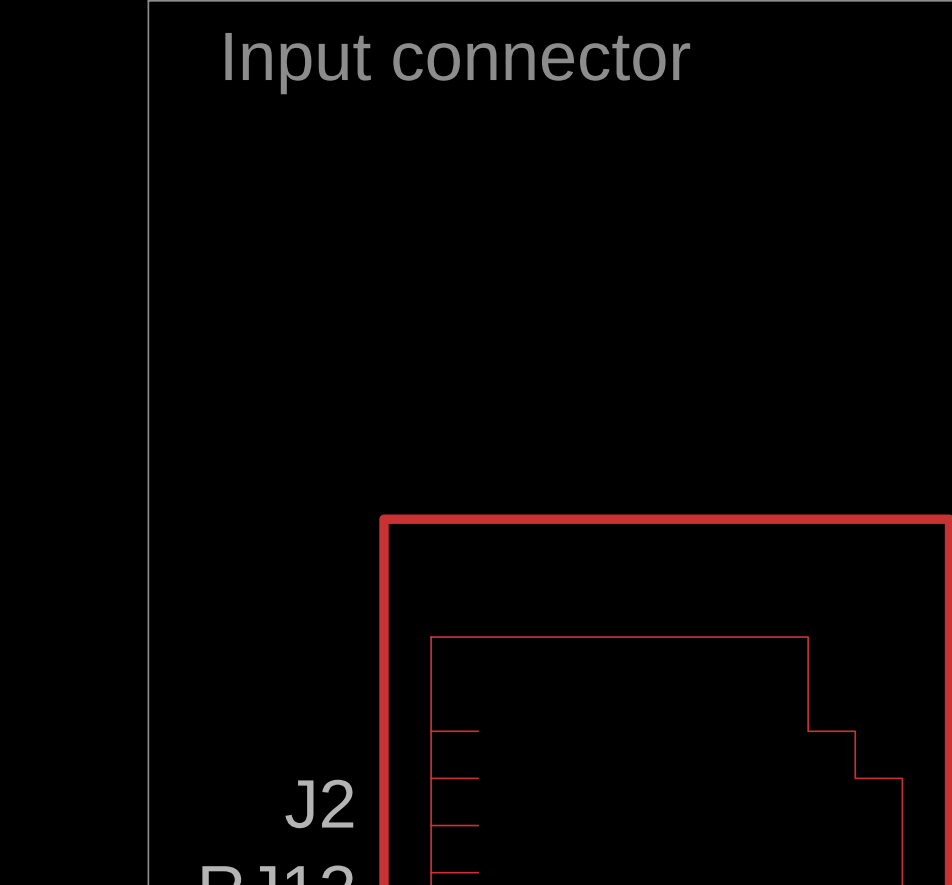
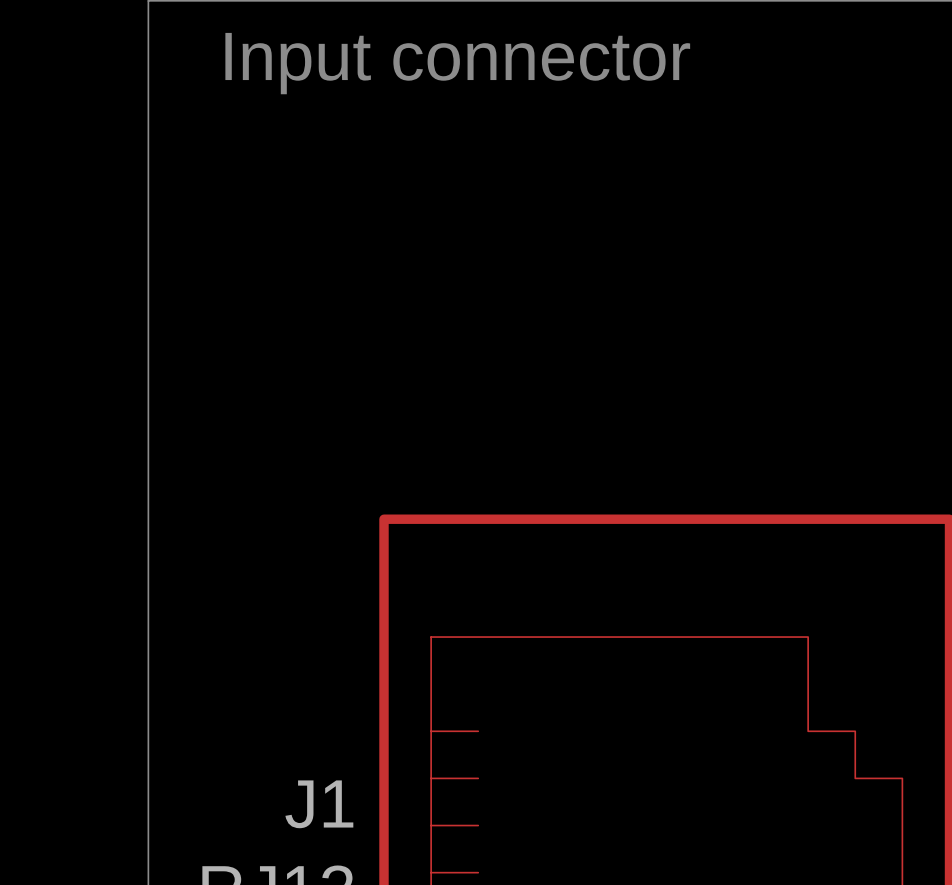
J2 name: J2 (319, 803) -> J1 (319, 804)

